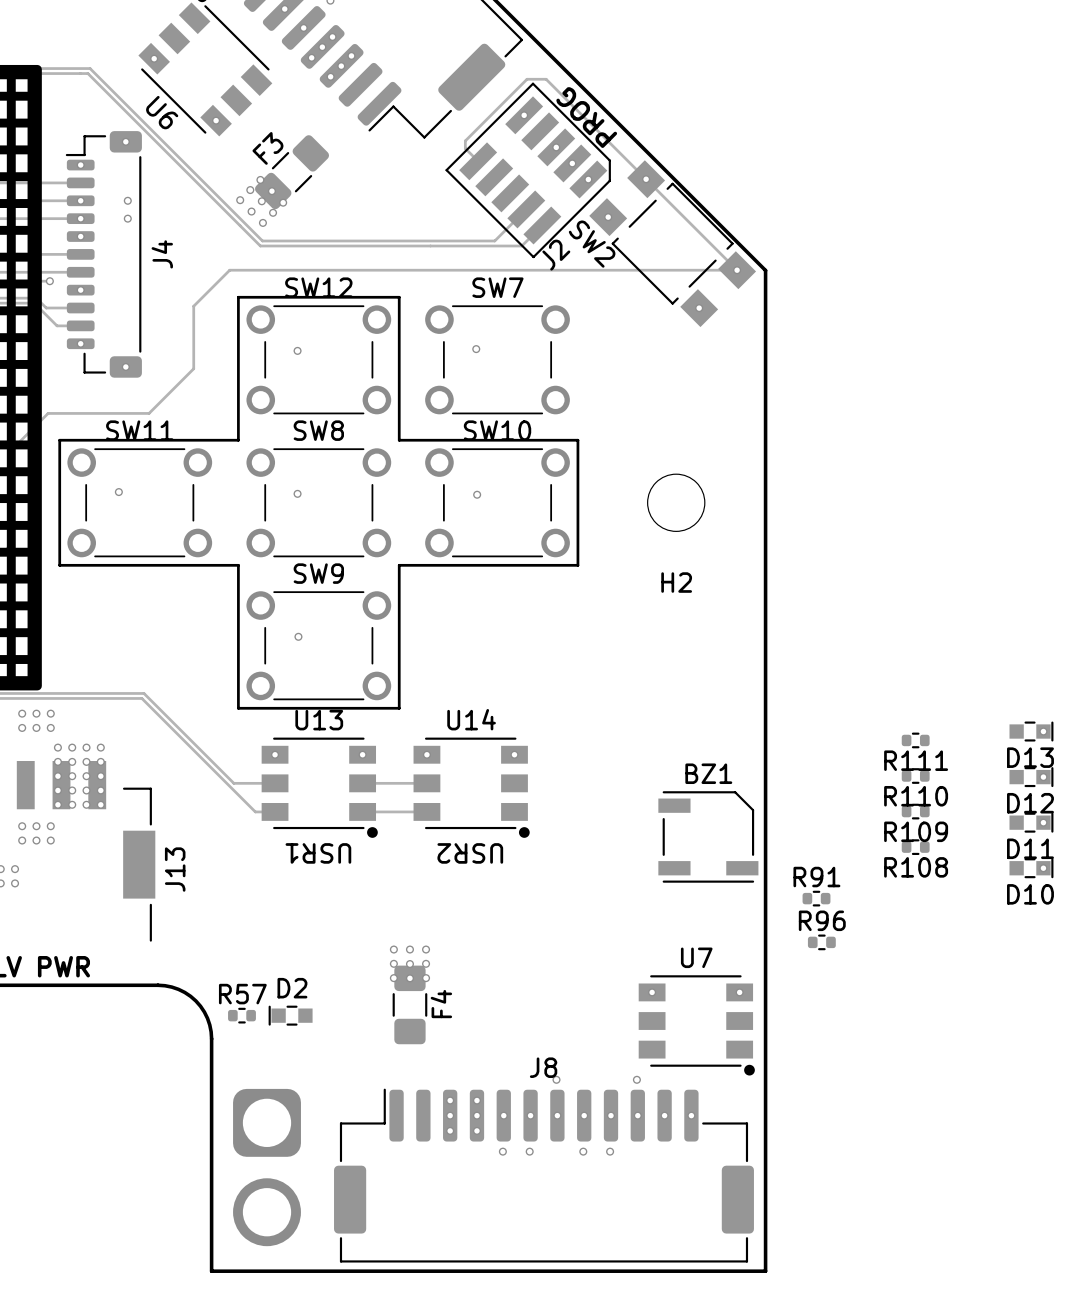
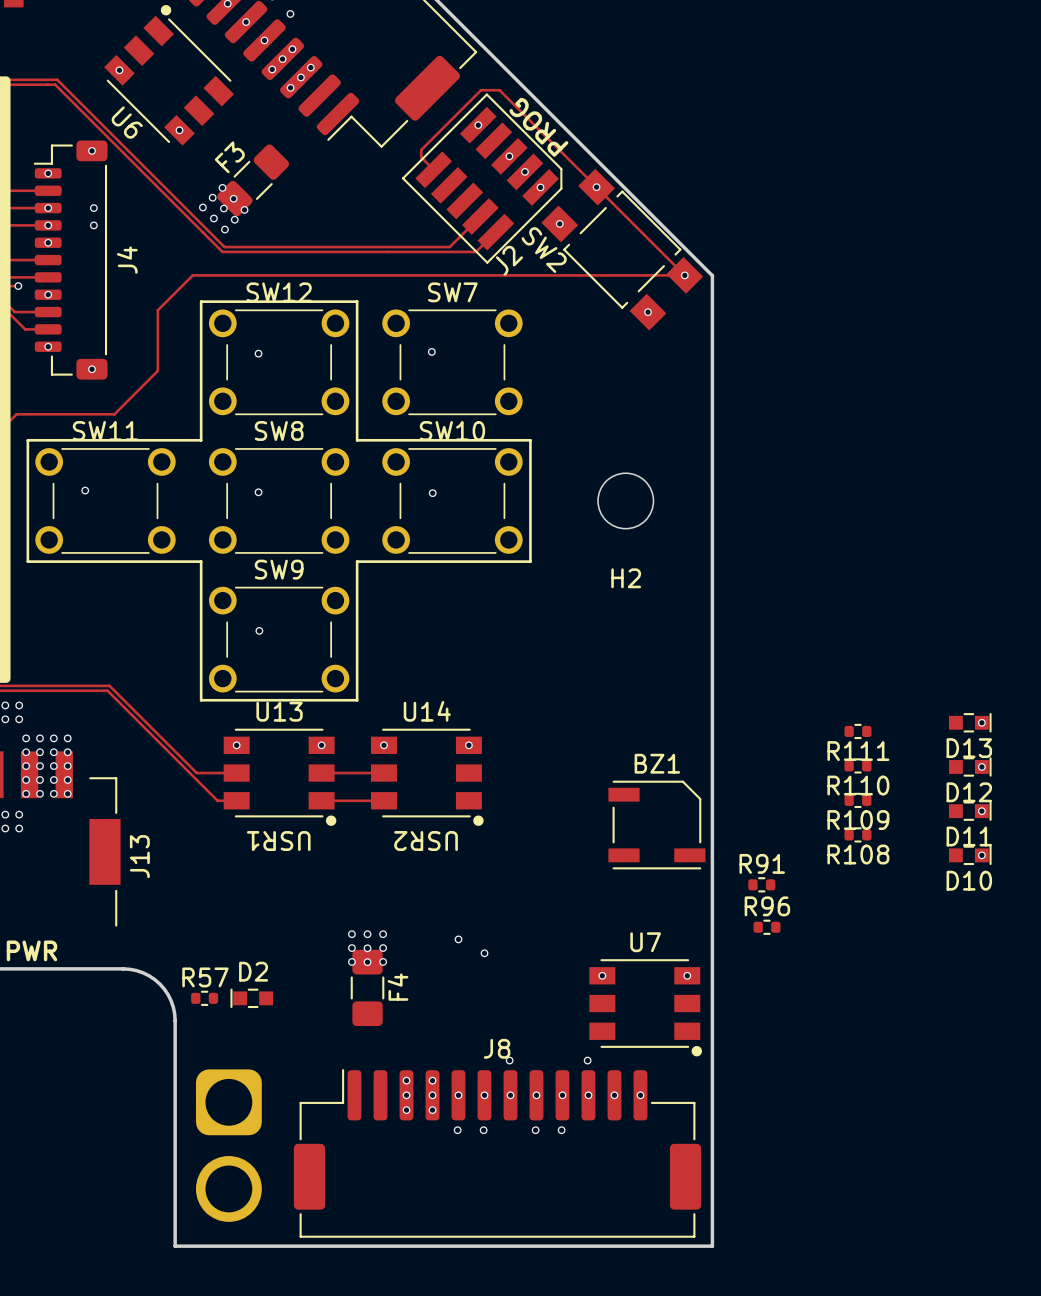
via: none -> (458, 939)
via: none -> (484, 953)

